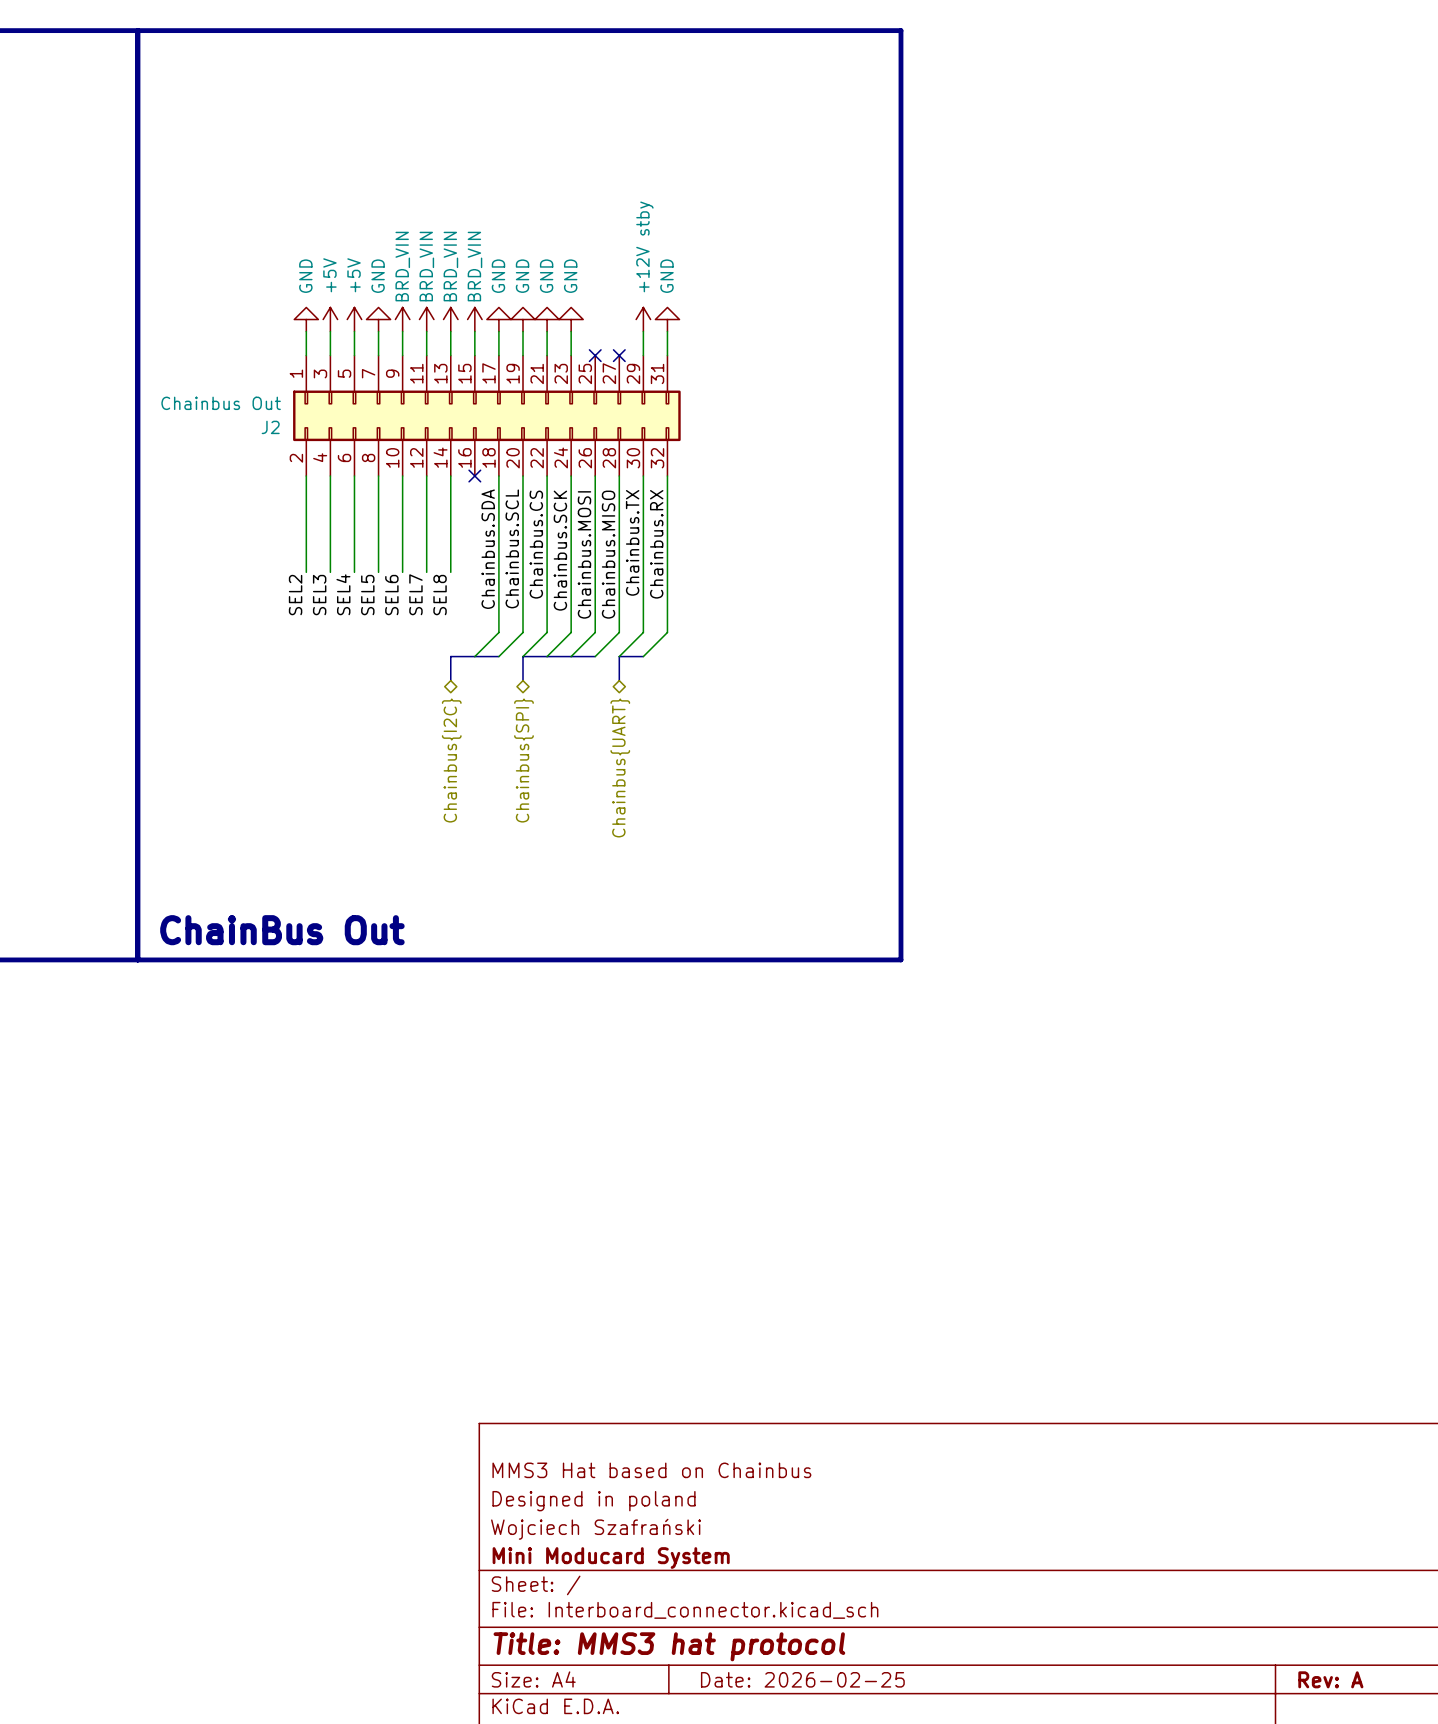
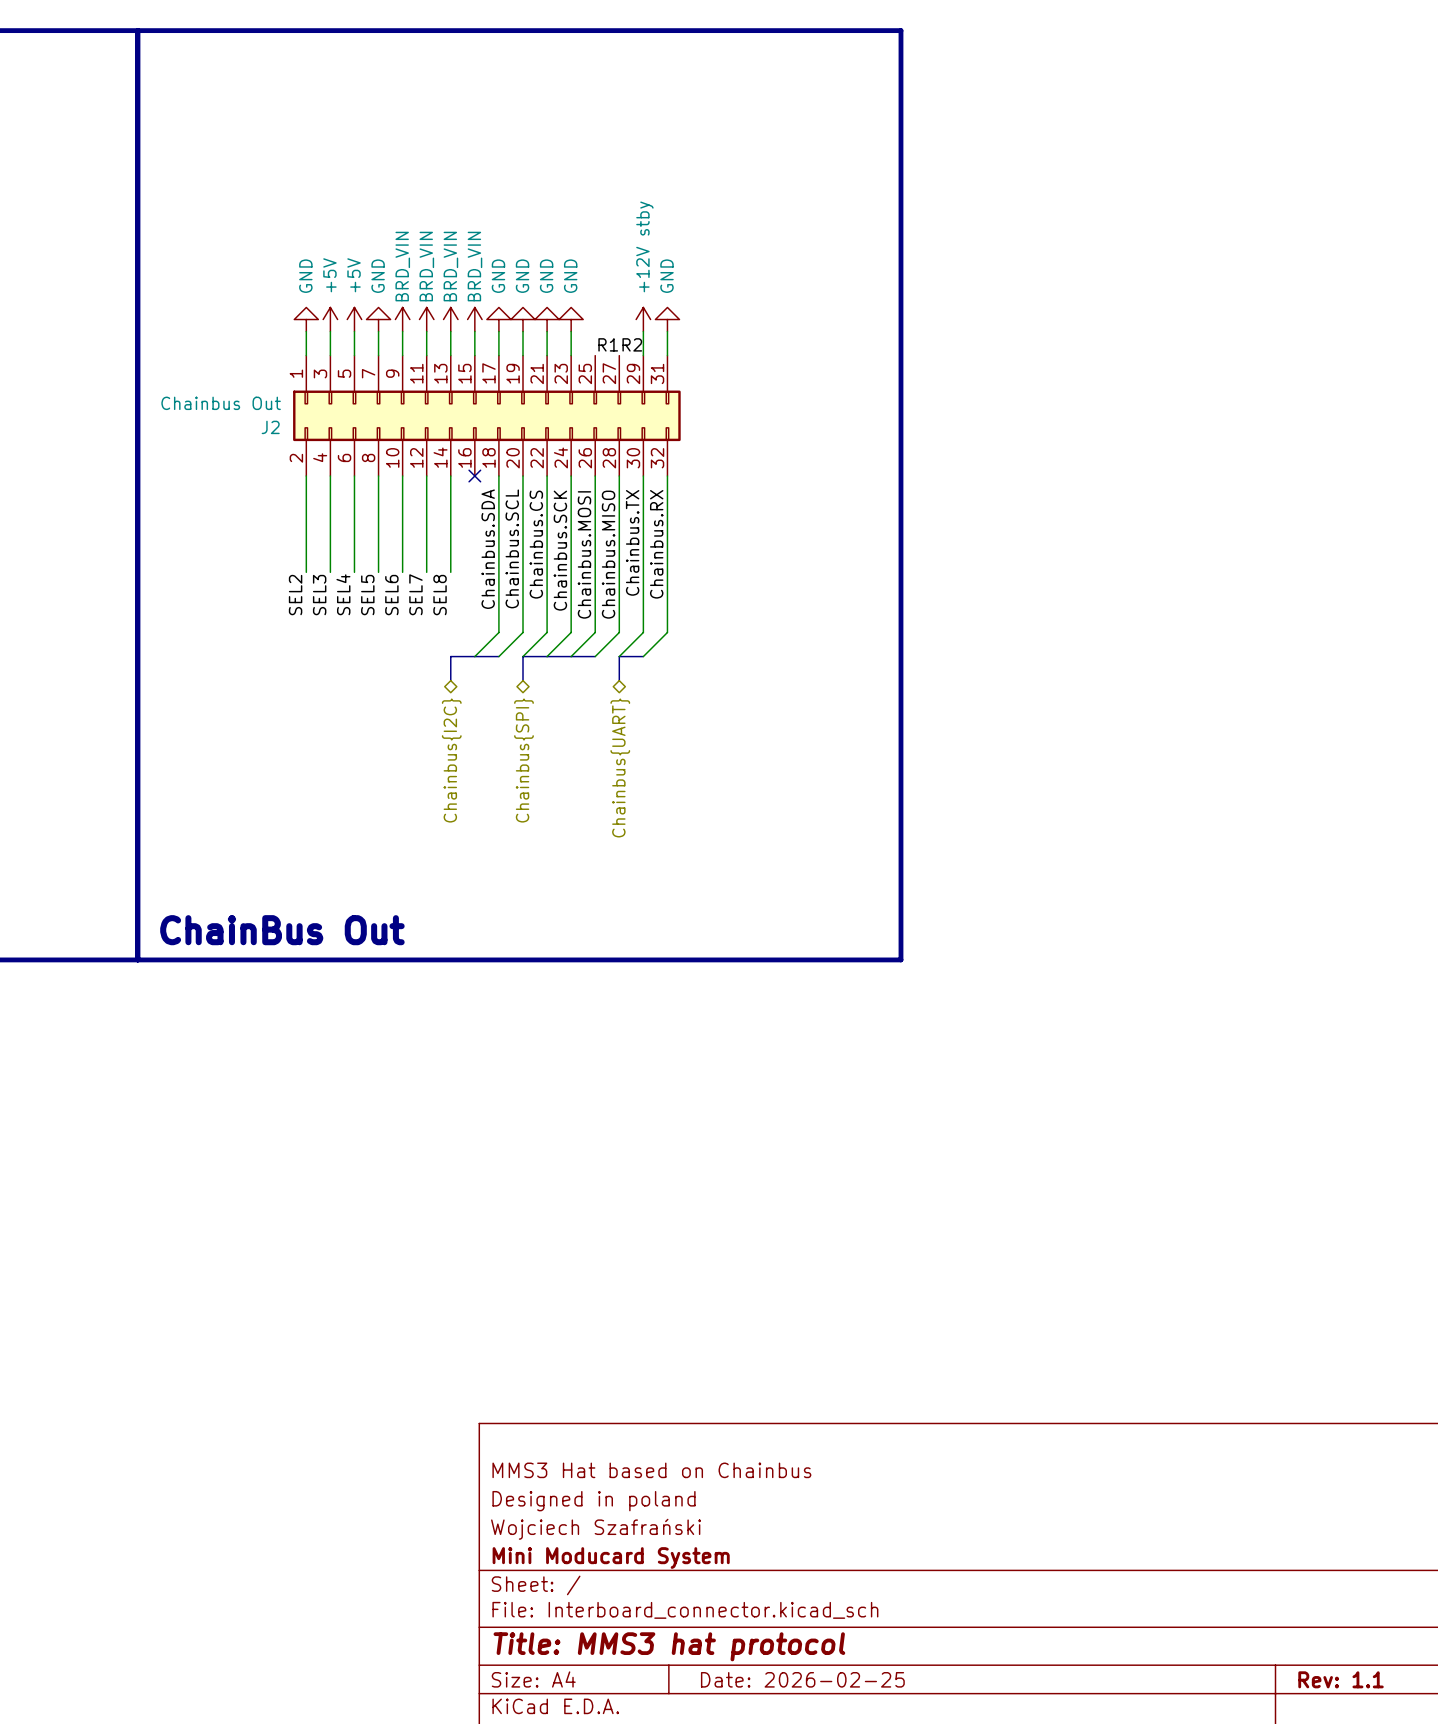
label: none -> R1 (608, 344)
label: none -> R2 (632, 344)
no-connect mark: (595, 355) -> none
no-connect mark: (619, 355) -> none
title block: Rev: A (1330, 1679) -> Rev: 1.1 (1341, 1679)

